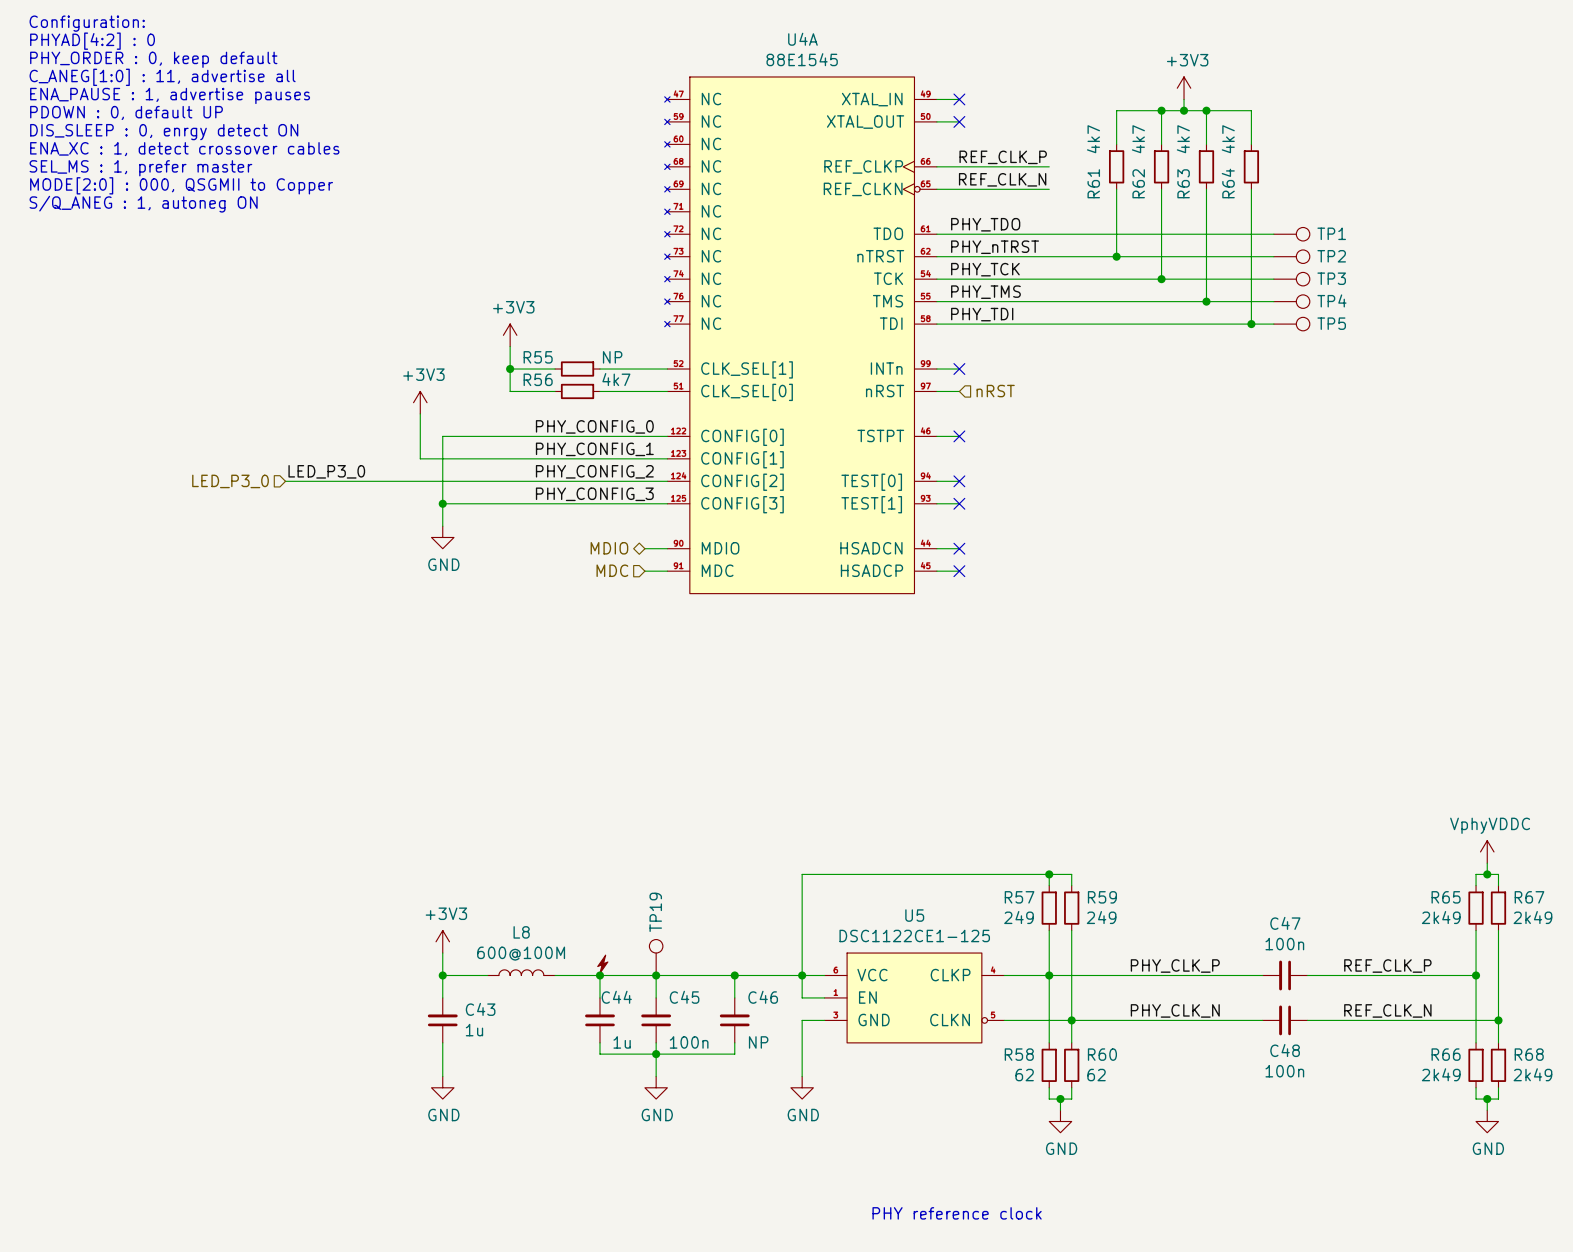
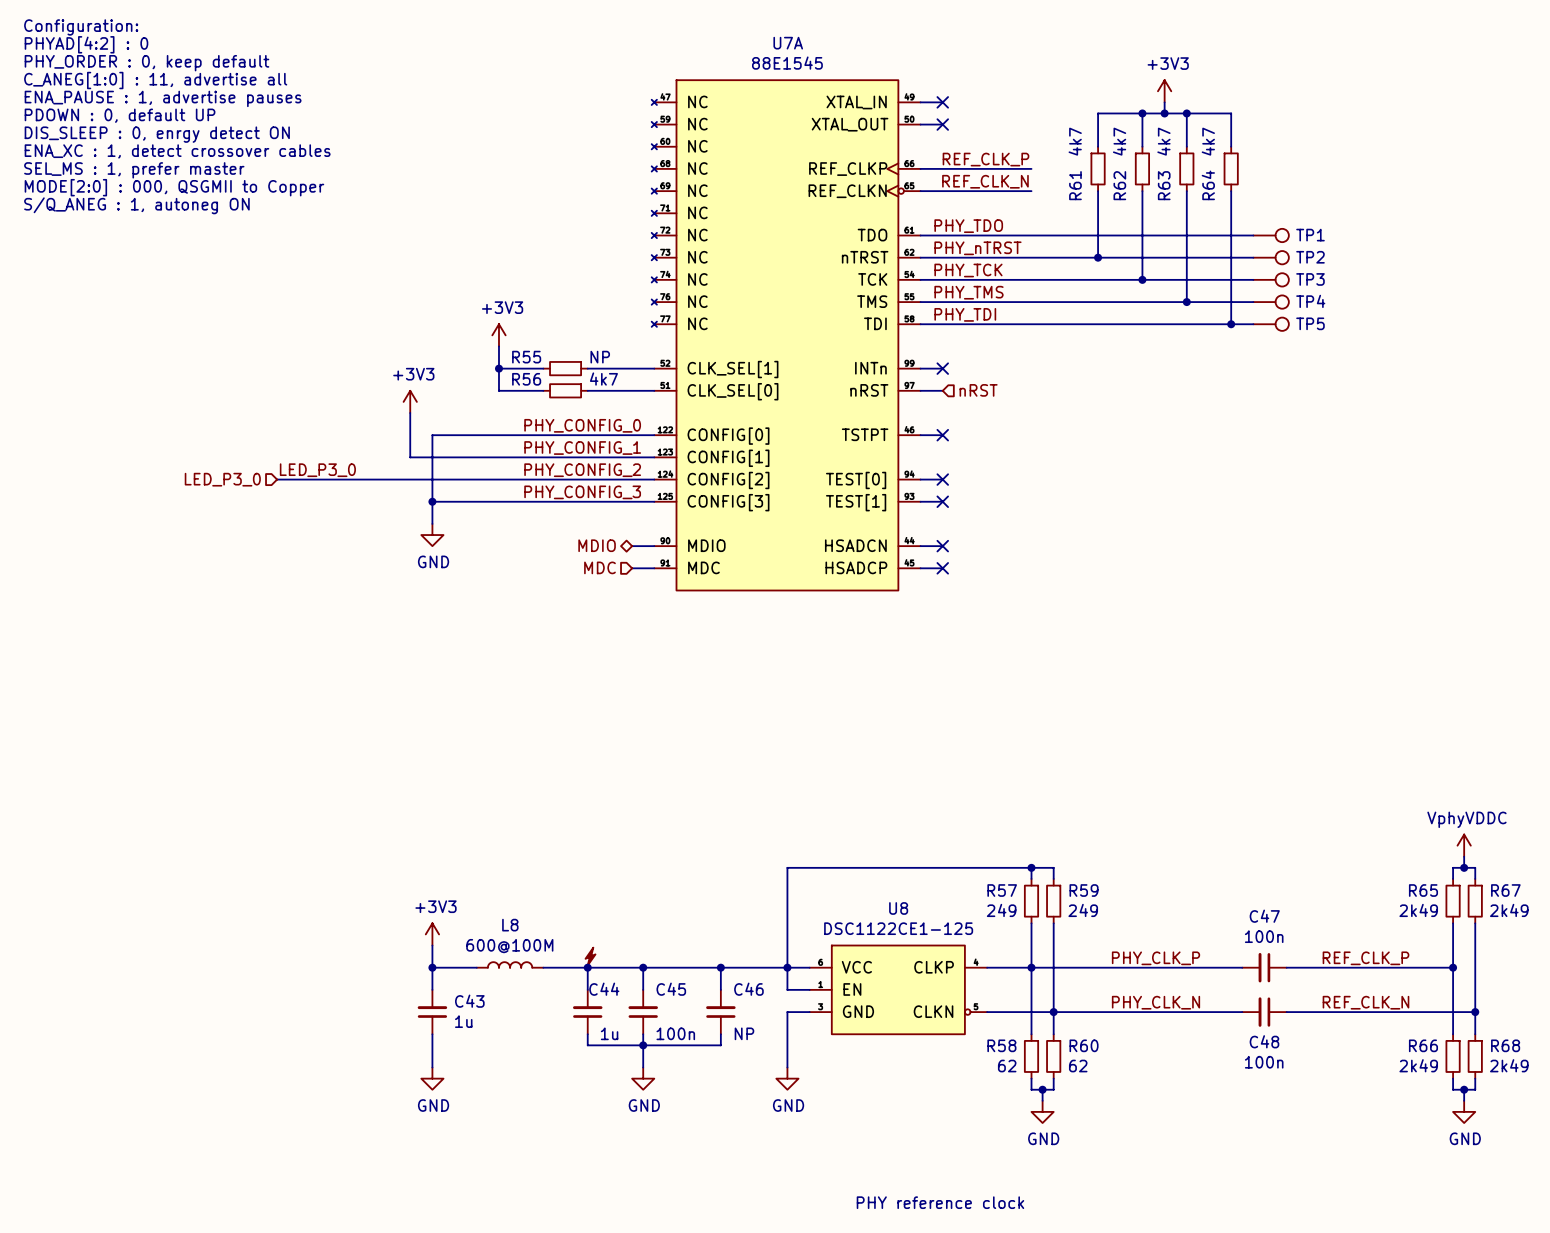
U4A name: U4A (802, 39) -> U7A (788, 43)
U5 name: U5 (914, 915) -> U8 (898, 908)
TP19: (656, 957) -> none

